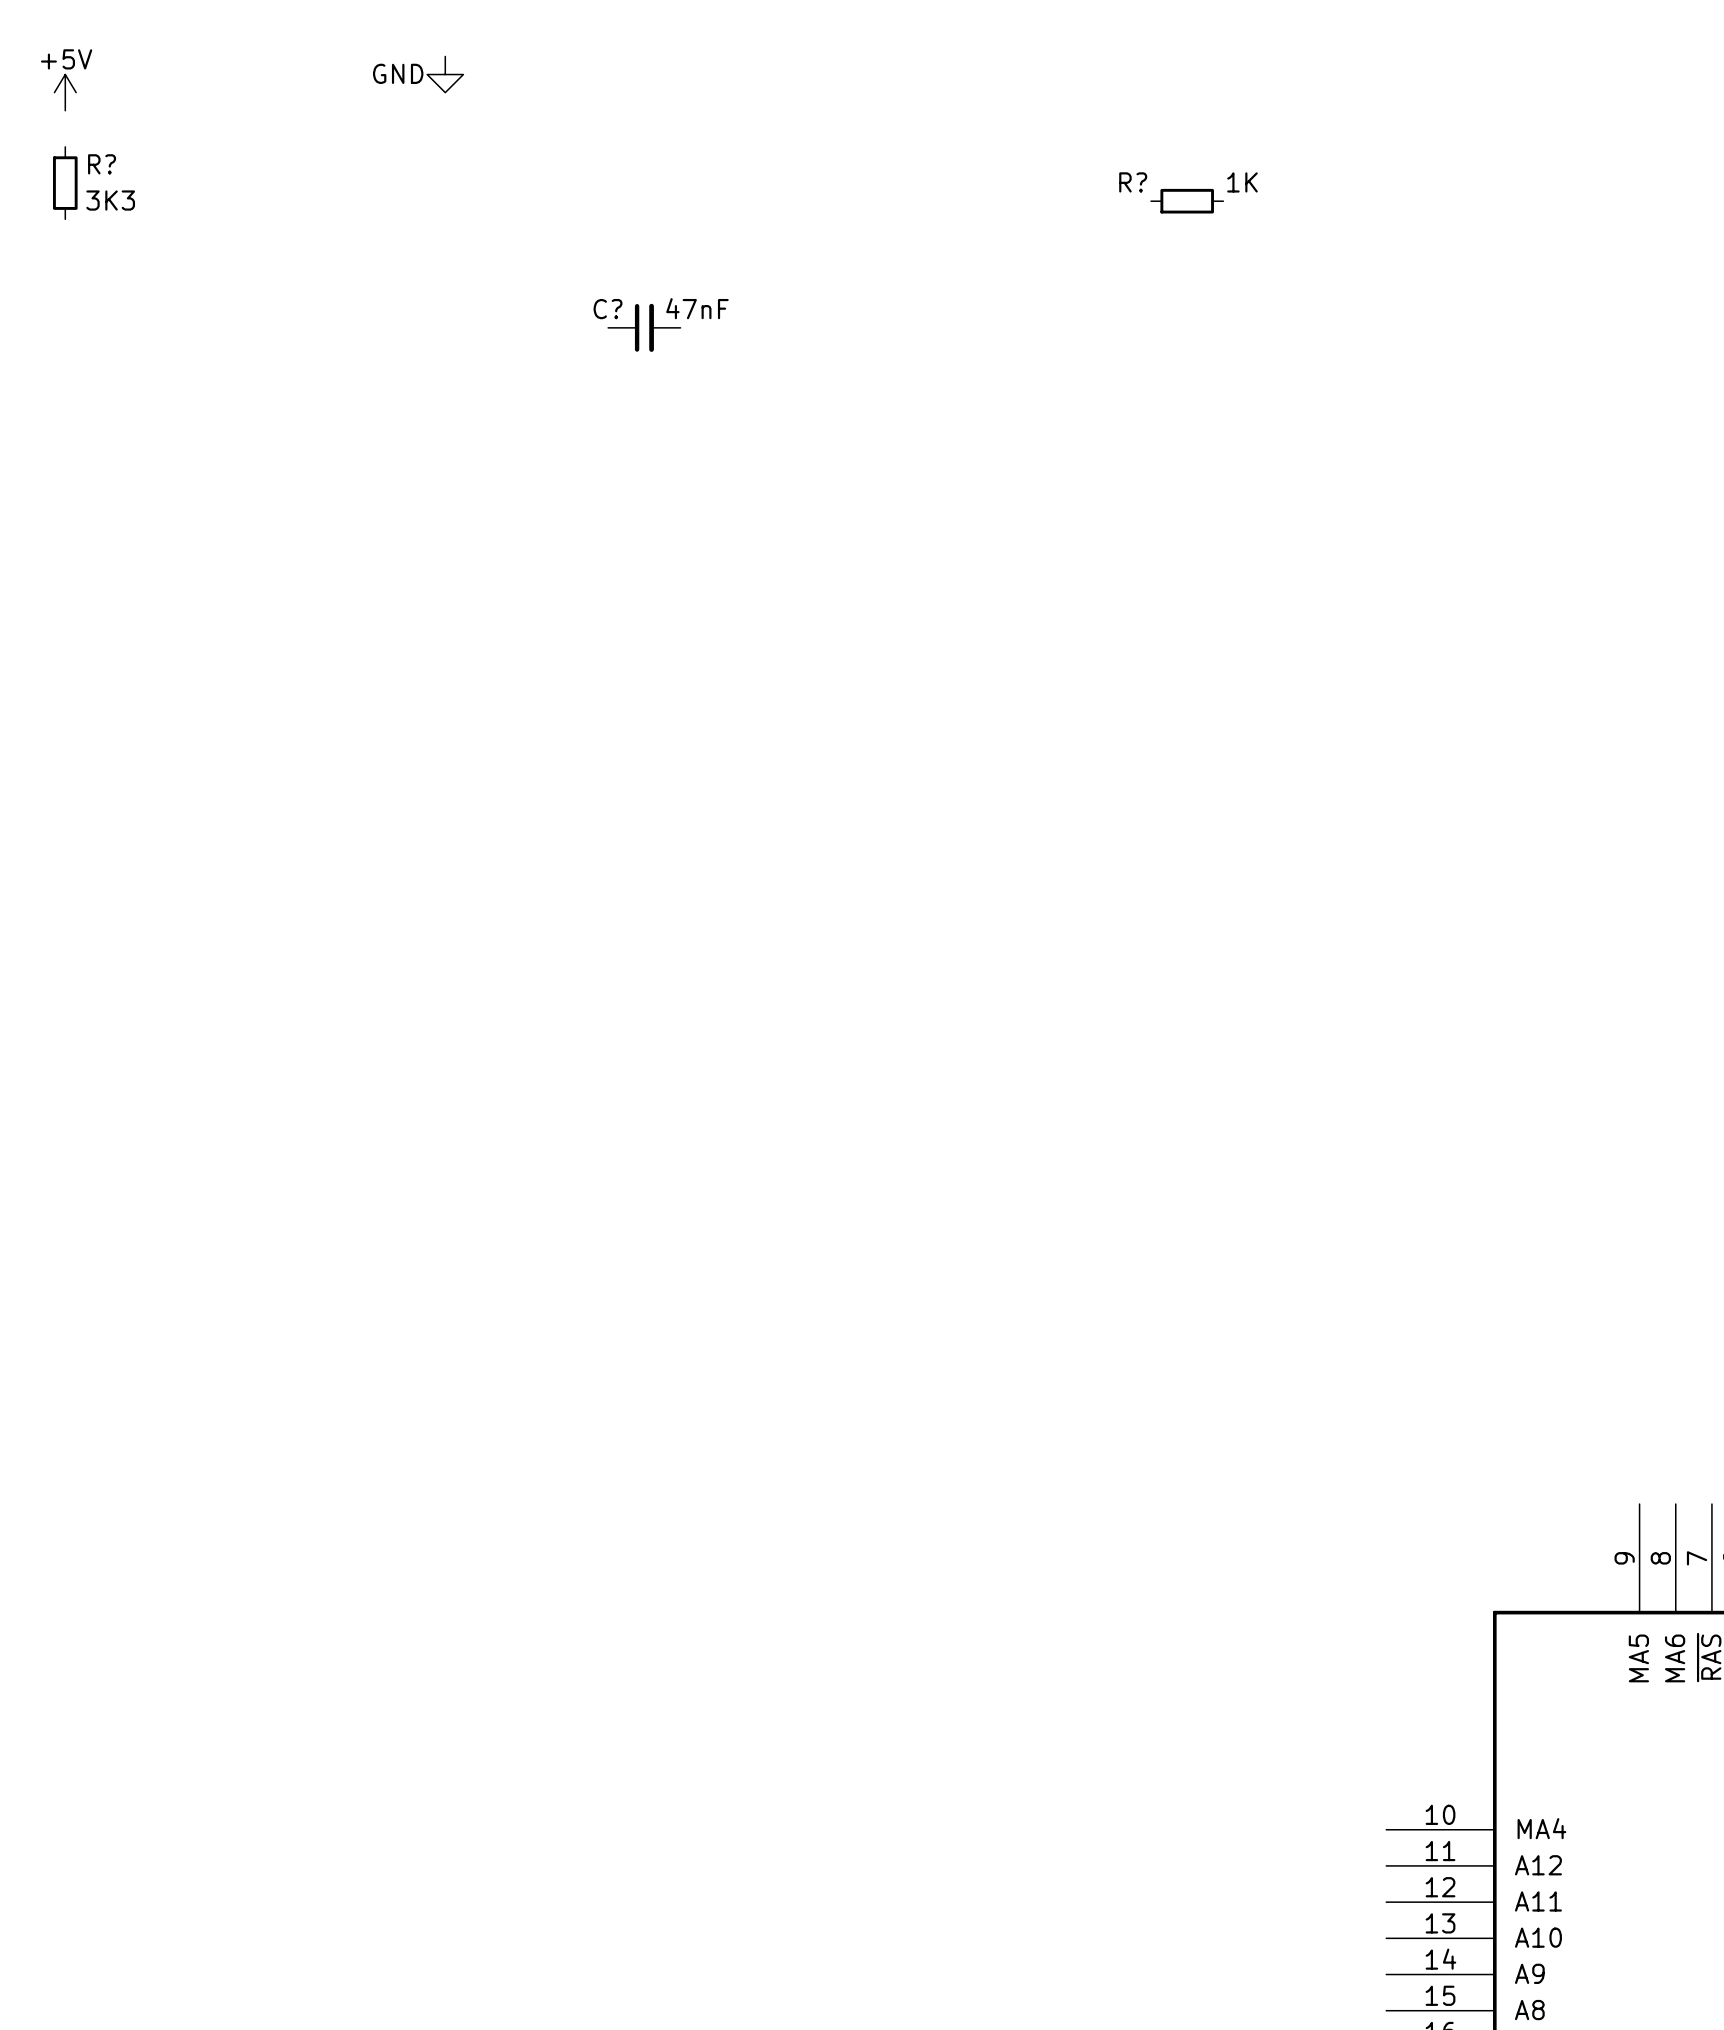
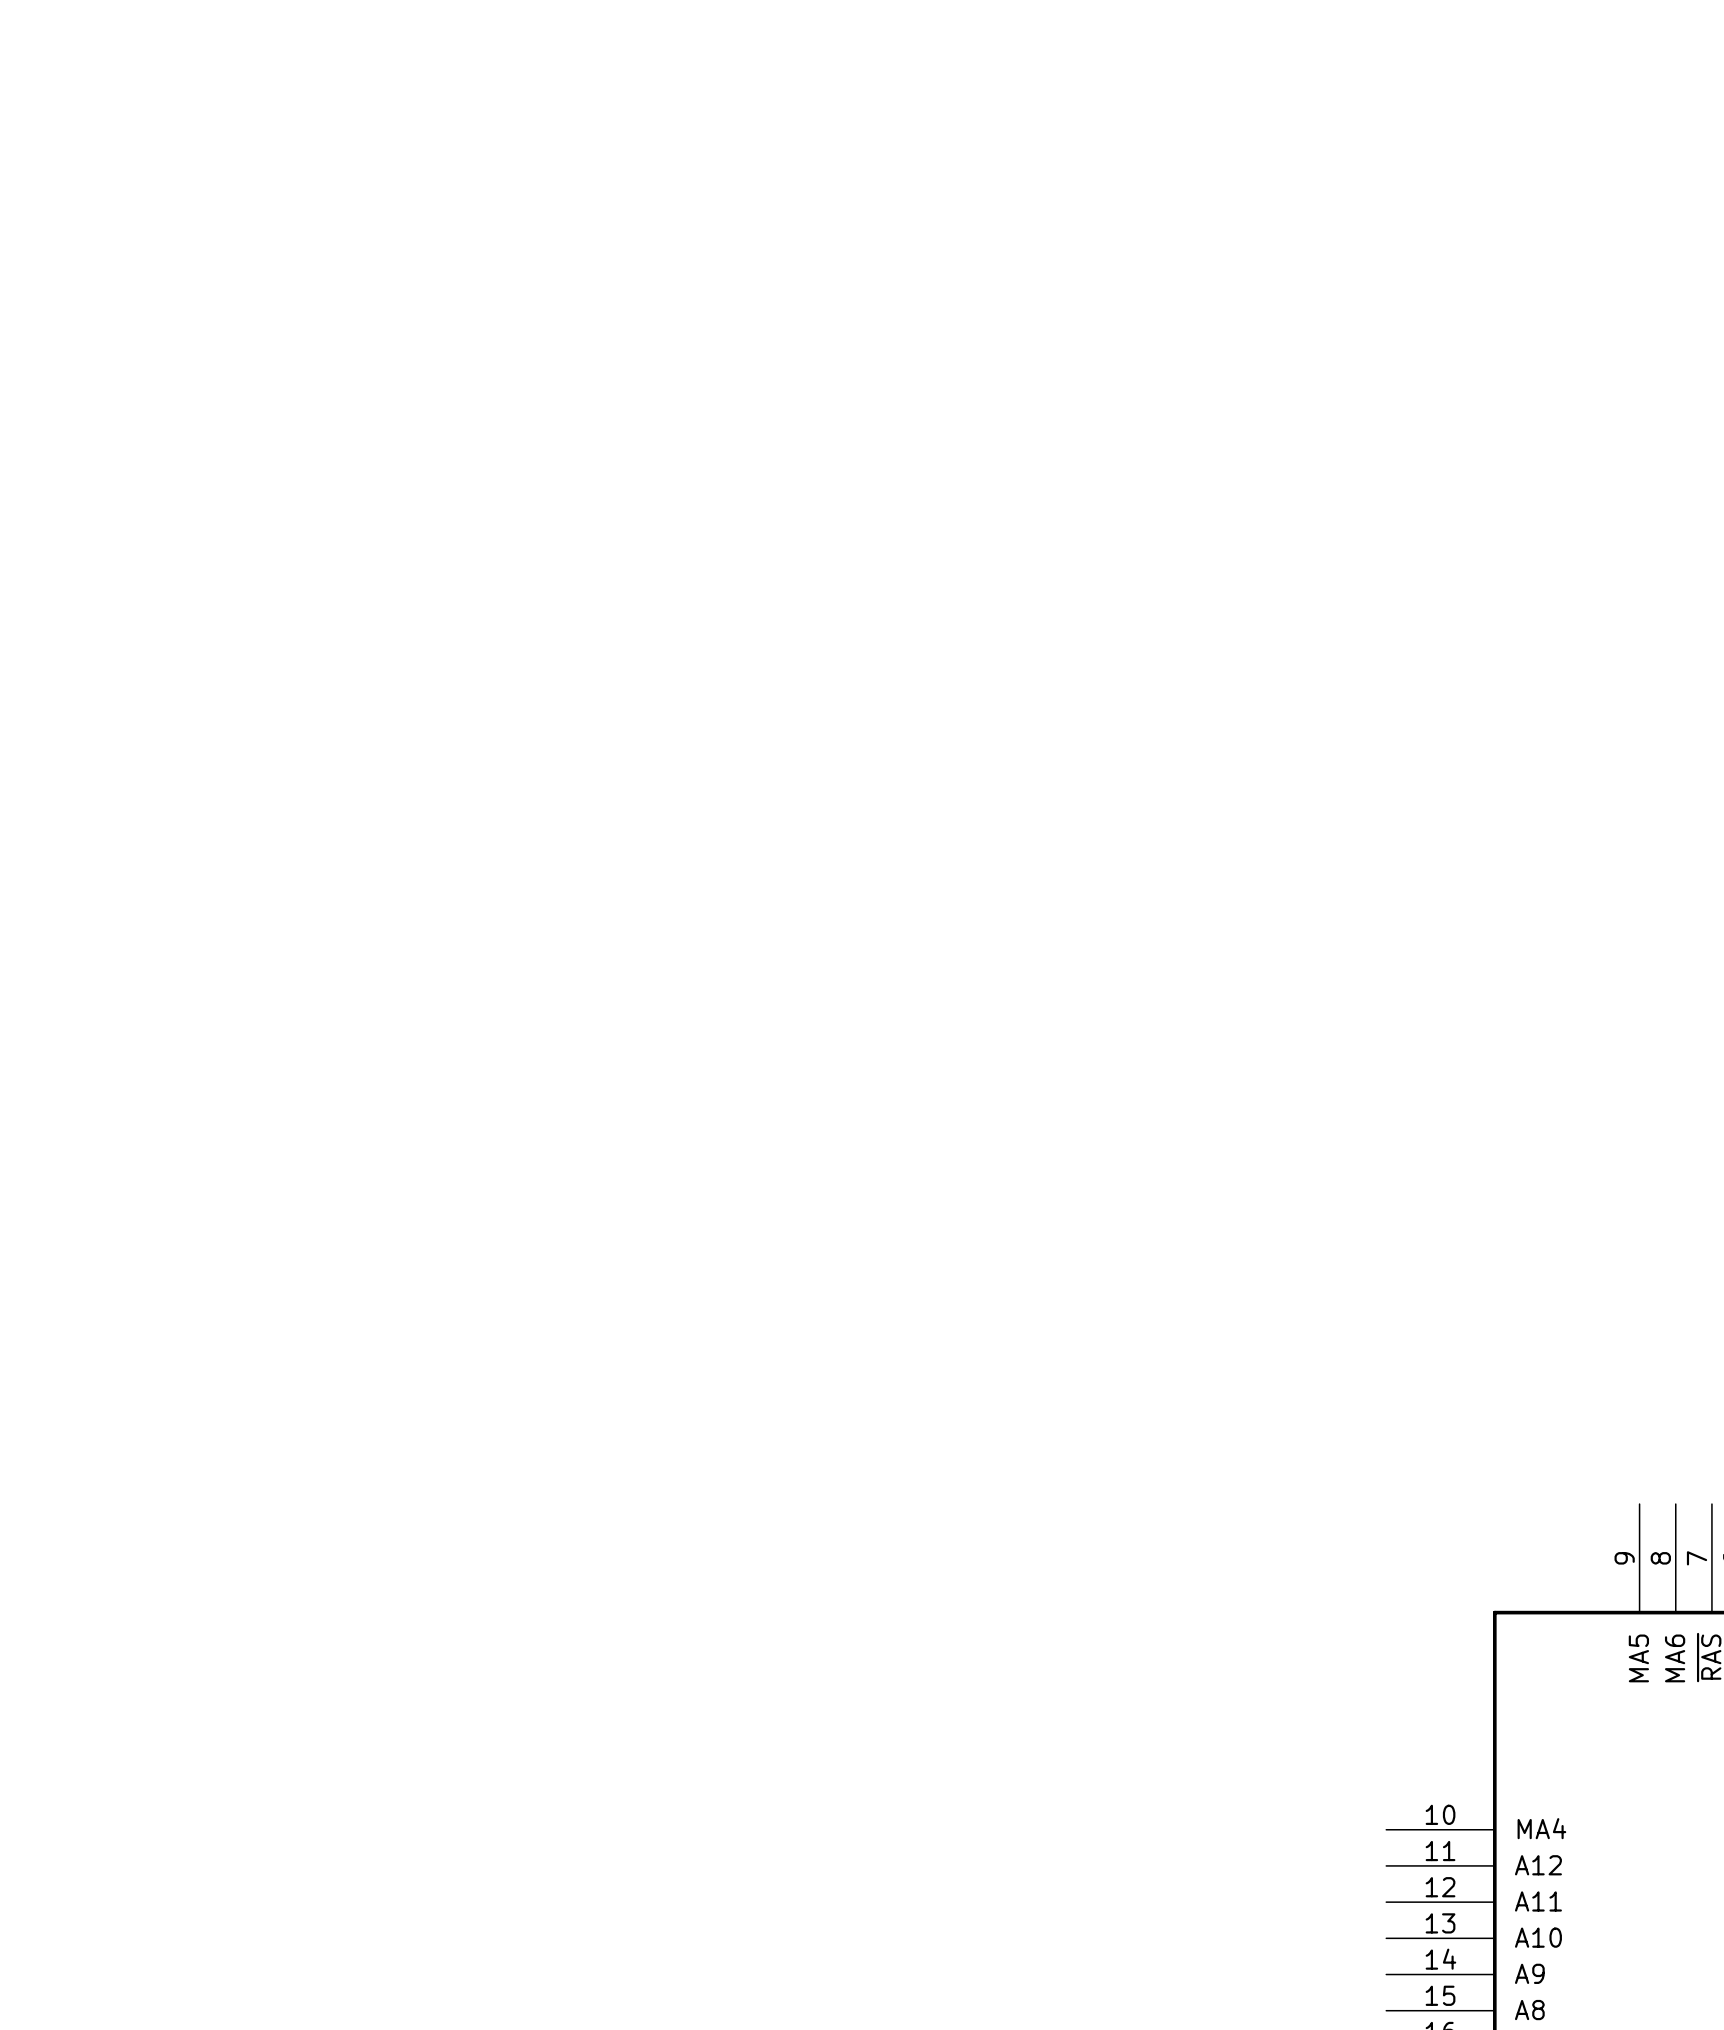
power symbol: GND (445, 74) -> none
power symbol: +5V (65, 92) -> none
R?: 3K3 (65, 183) -> none
R?: 1K (1187, 201) -> none
C?: 47nF (644, 327) -> none

